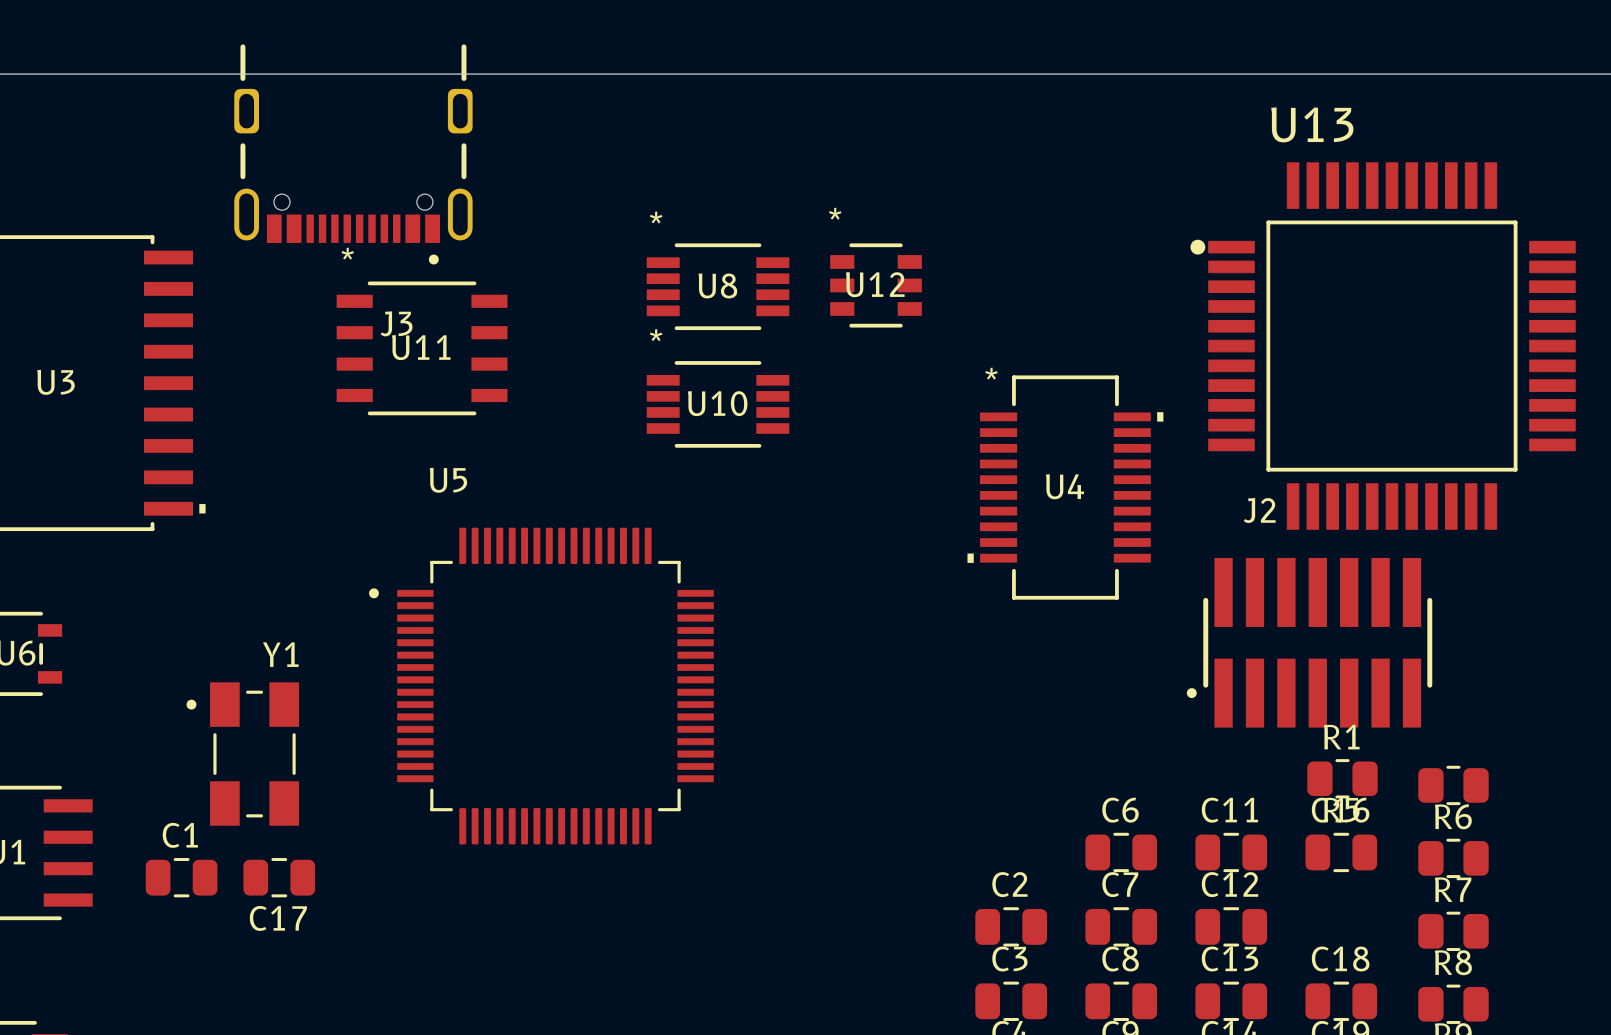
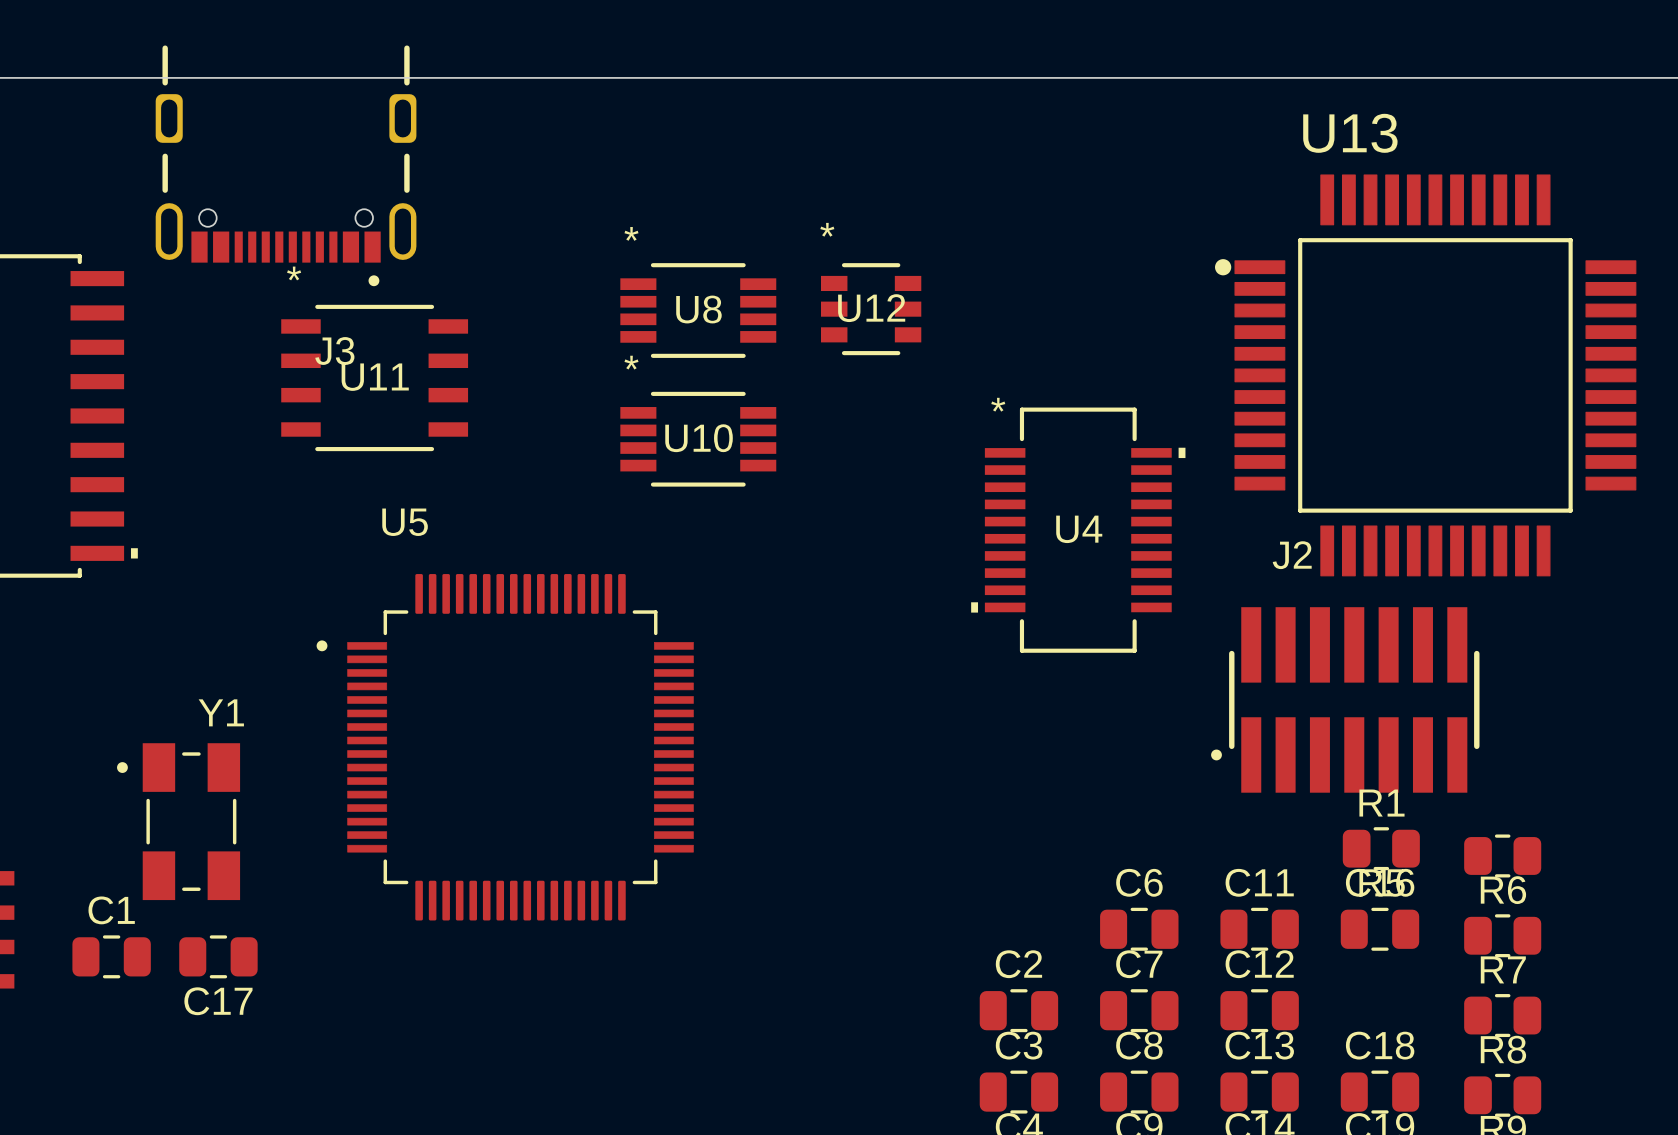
J3 position: (353, 154) -> (286, 165)

